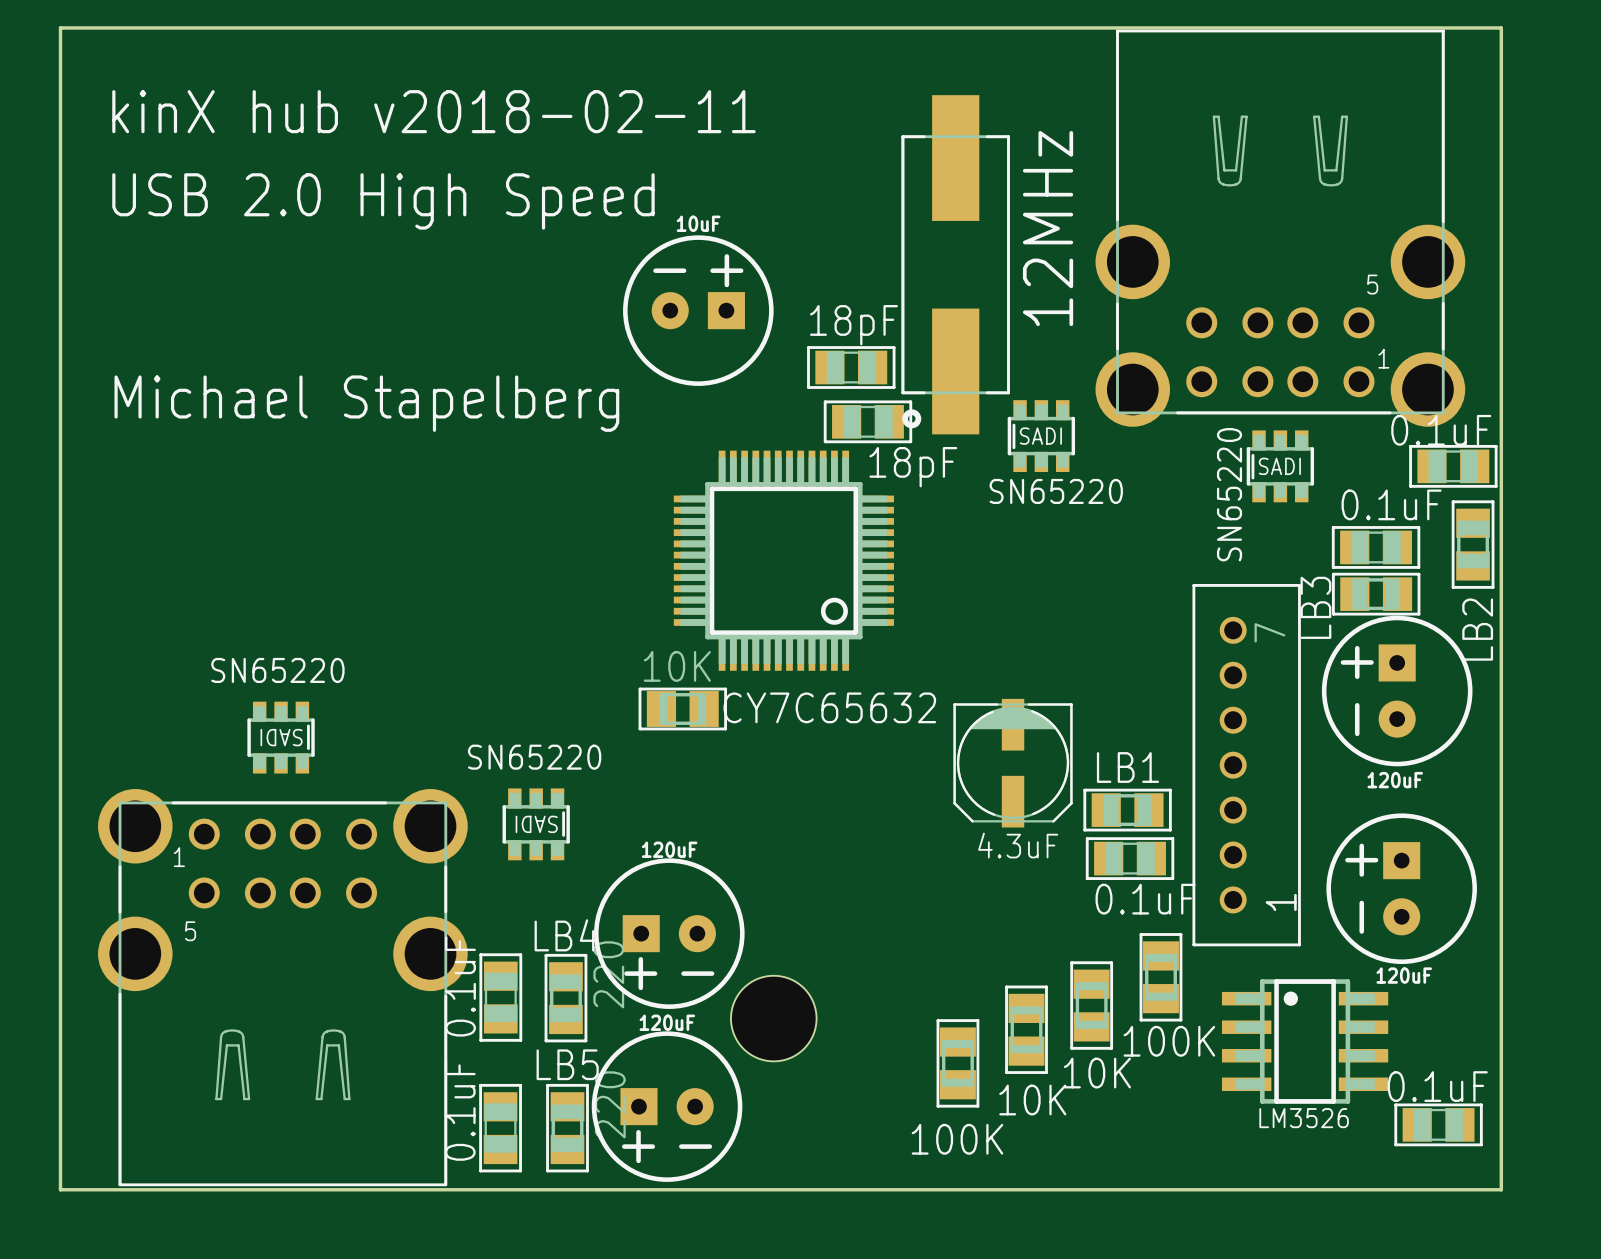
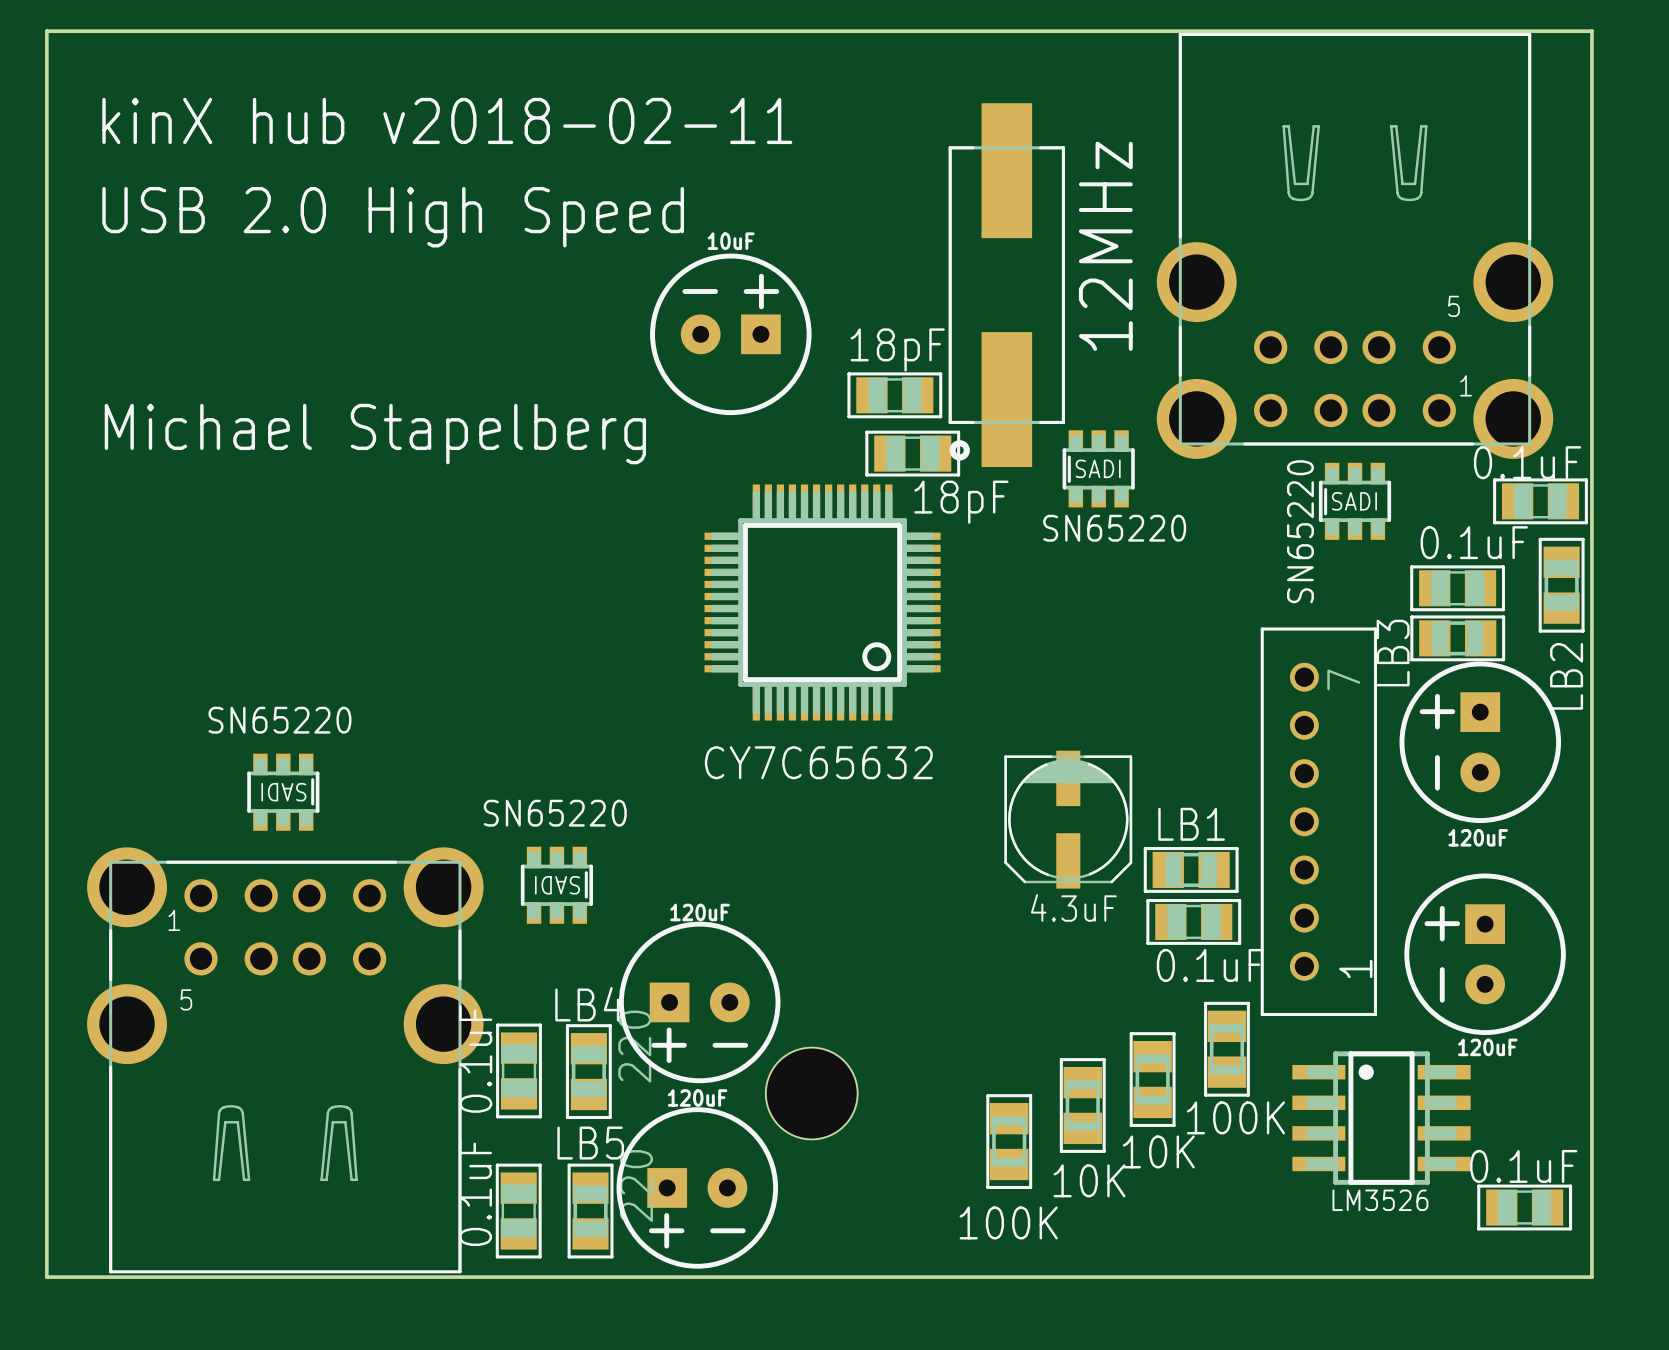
part value position: CY7C65632 (829, 707) -> CY7C65632 (818, 762)
part: 10K (682, 708) -> none

